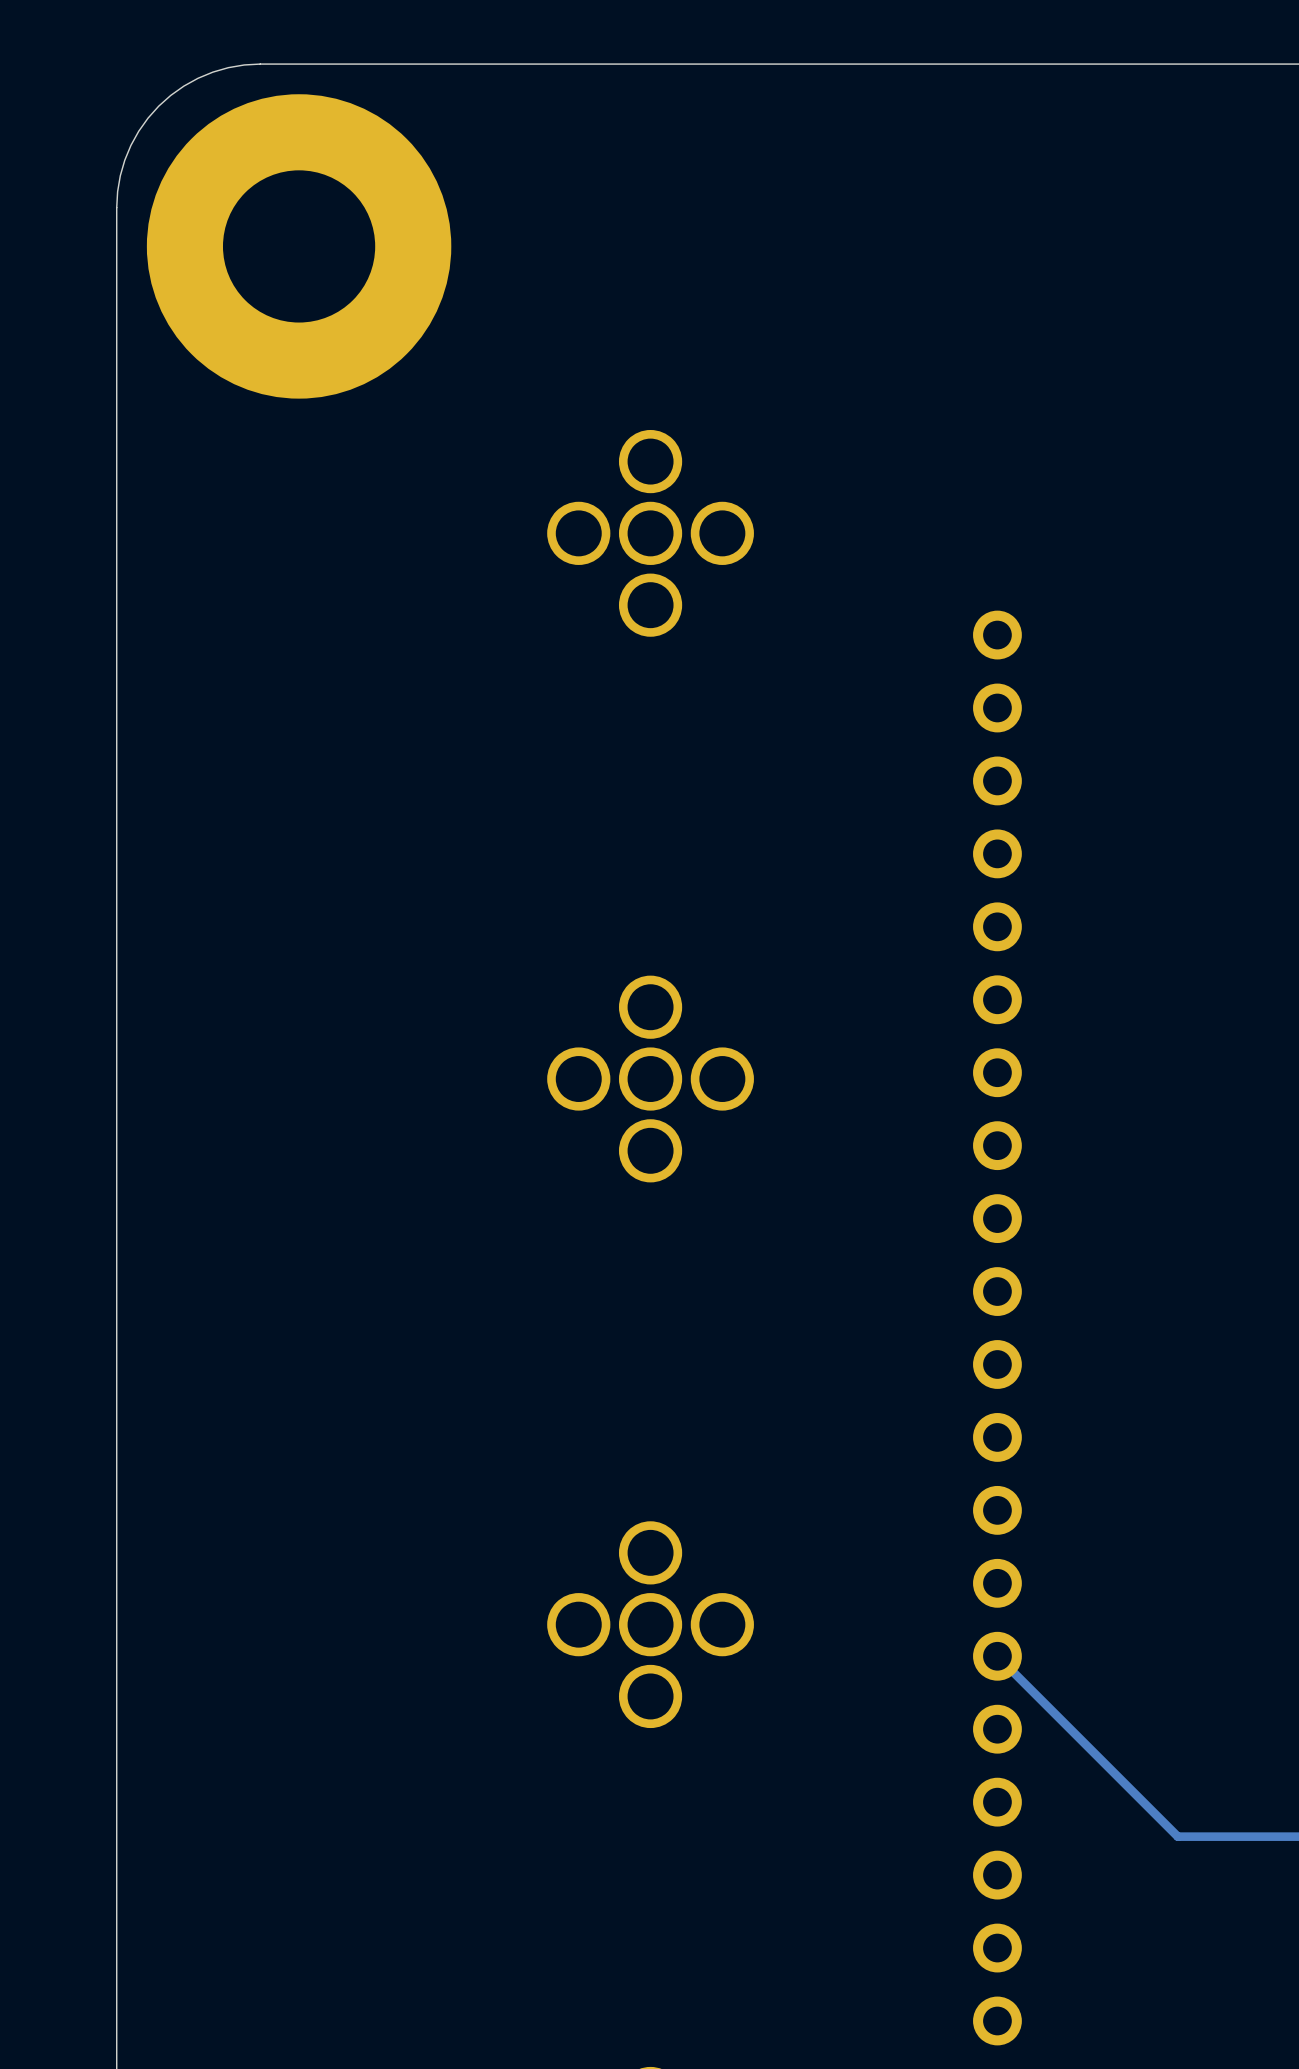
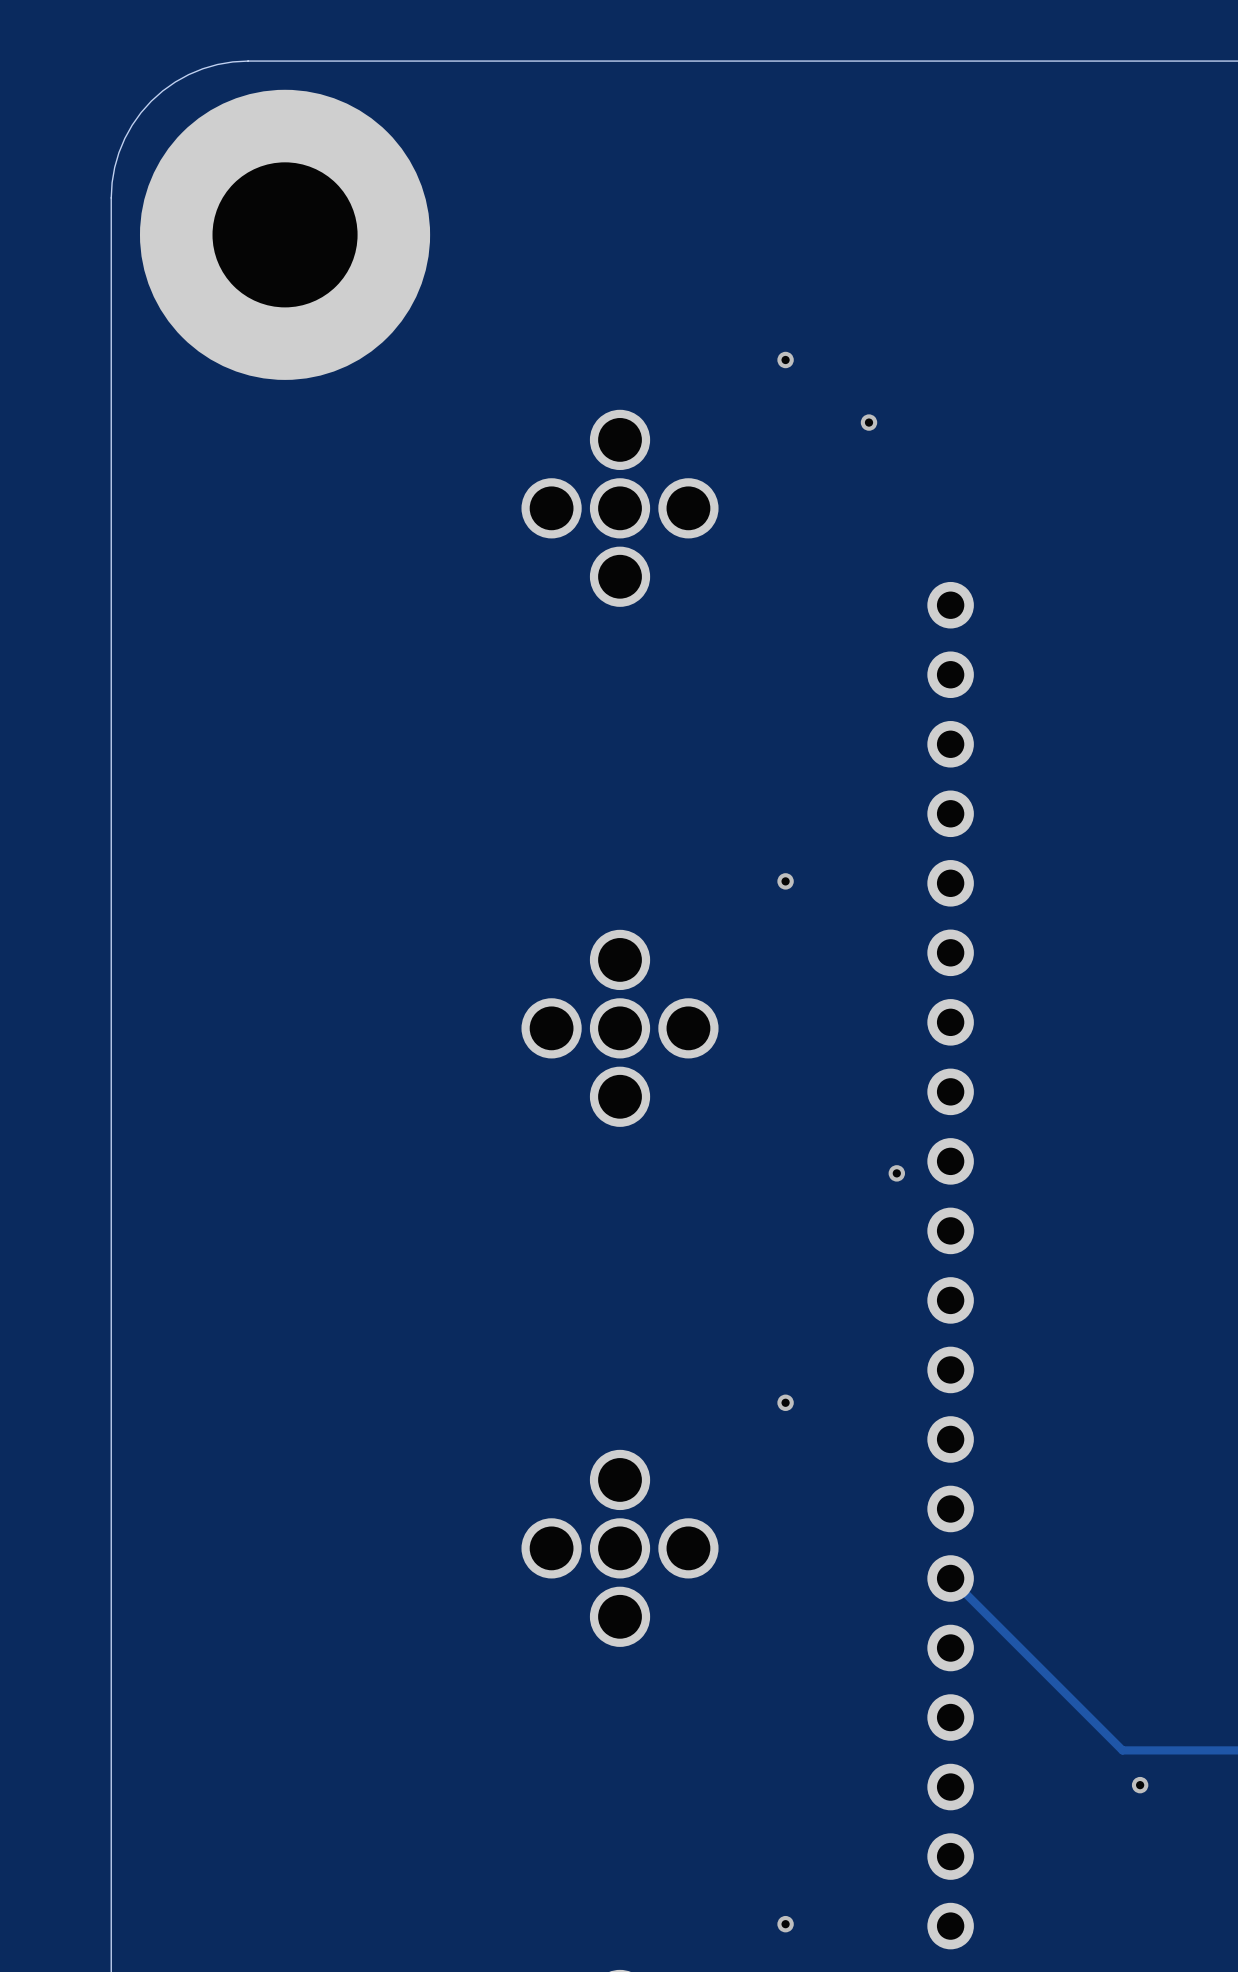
via: none -> (785, 359)
via: none -> (869, 422)
via: none -> (785, 881)
via: none -> (896, 1173)
via: none -> (785, 1402)
via: none -> (1140, 1785)
via: none -> (785, 1924)

